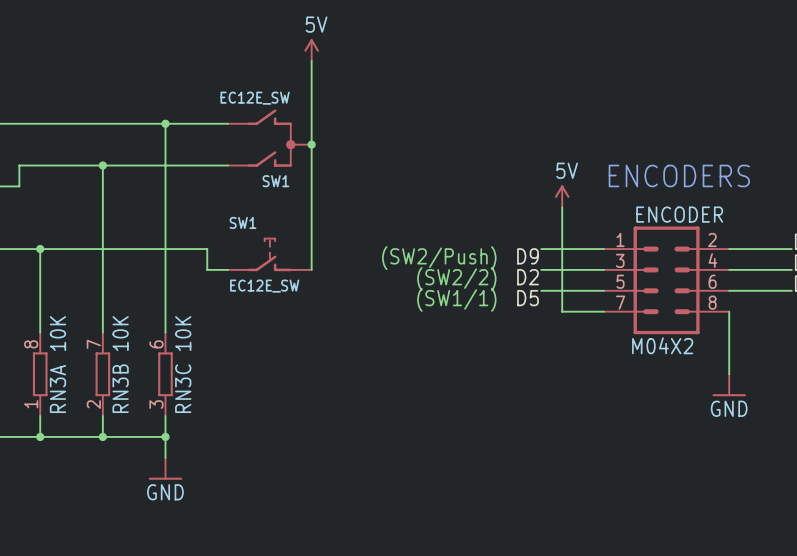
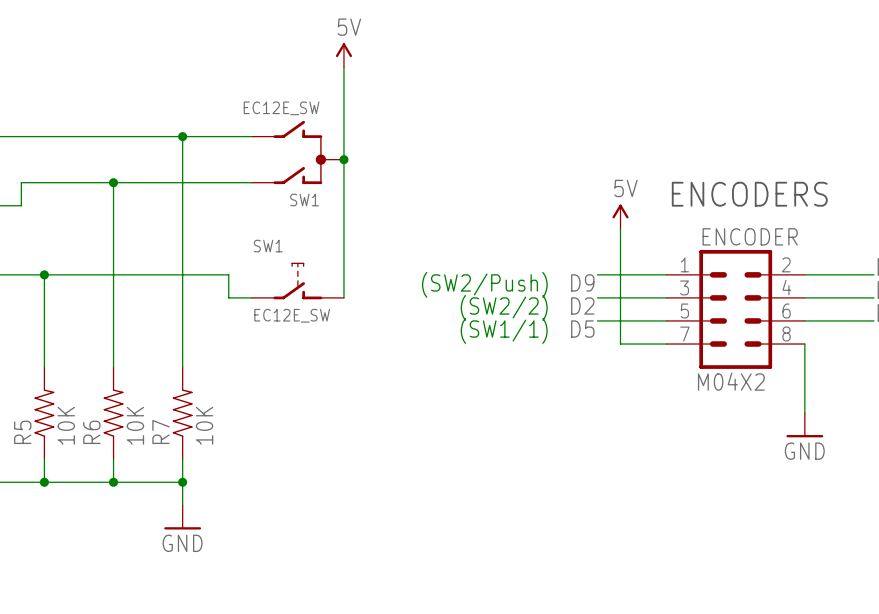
RN3A: 10K (40, 374) -> none
R5: none -> 10K (44, 413)
RN3B: 10K (102, 374) -> none
R6: none -> 10K (113, 413)
RN3C: 10K (165, 374) -> none
R7: none -> 10K (182, 413)

